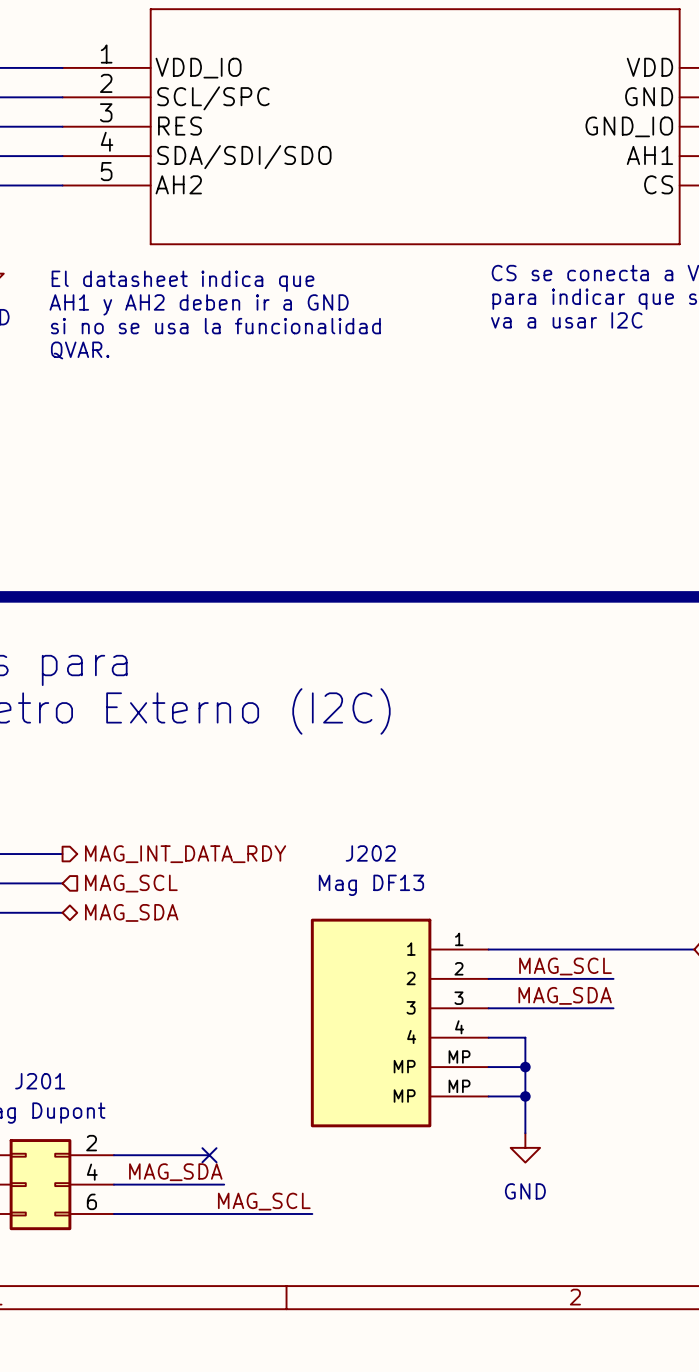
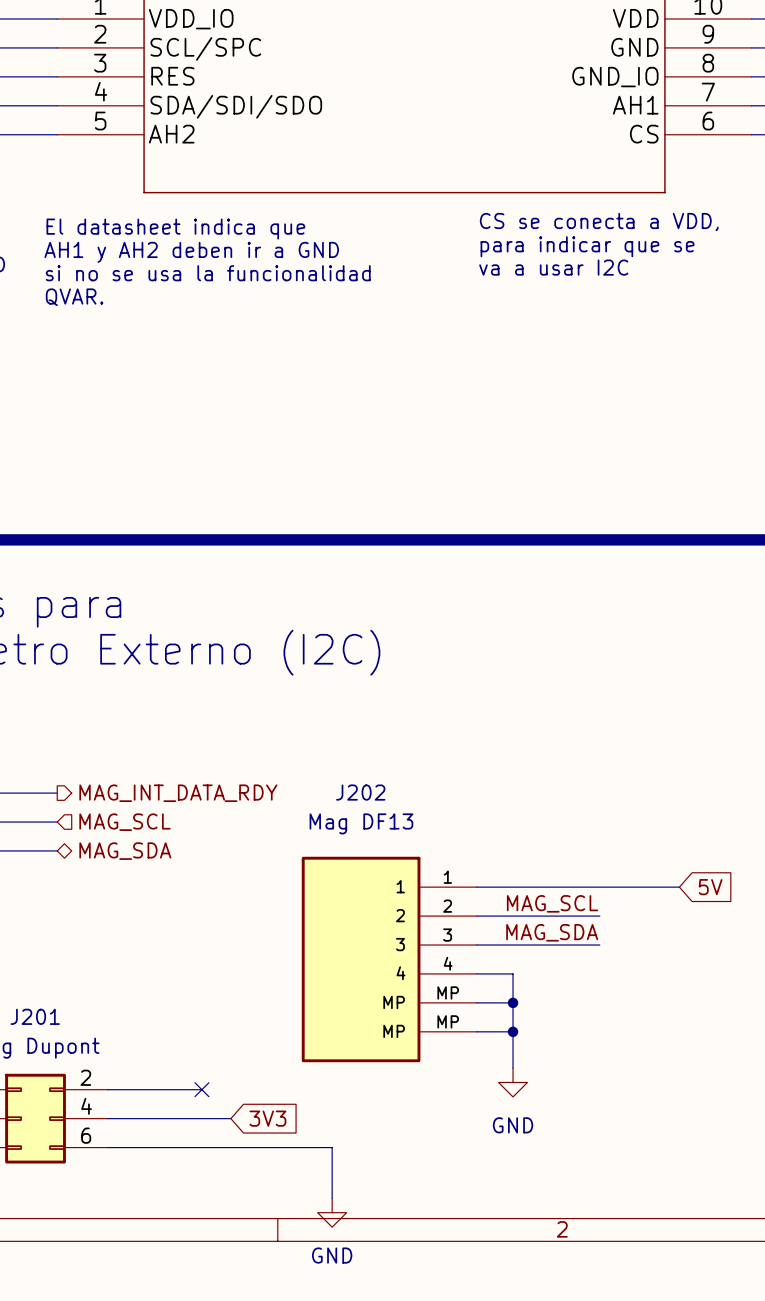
label: MAG_SDA (175, 1172) -> none
wire: none -> (216, 1118) (230, 1118)
global label: none -> 3V3 (267, 1118)
label: MAG_SCL (264, 1201) -> none
wire: none -> (303, 1147) (332, 1147) (332, 1198)
power symbol: none -> GND (332, 1212)

